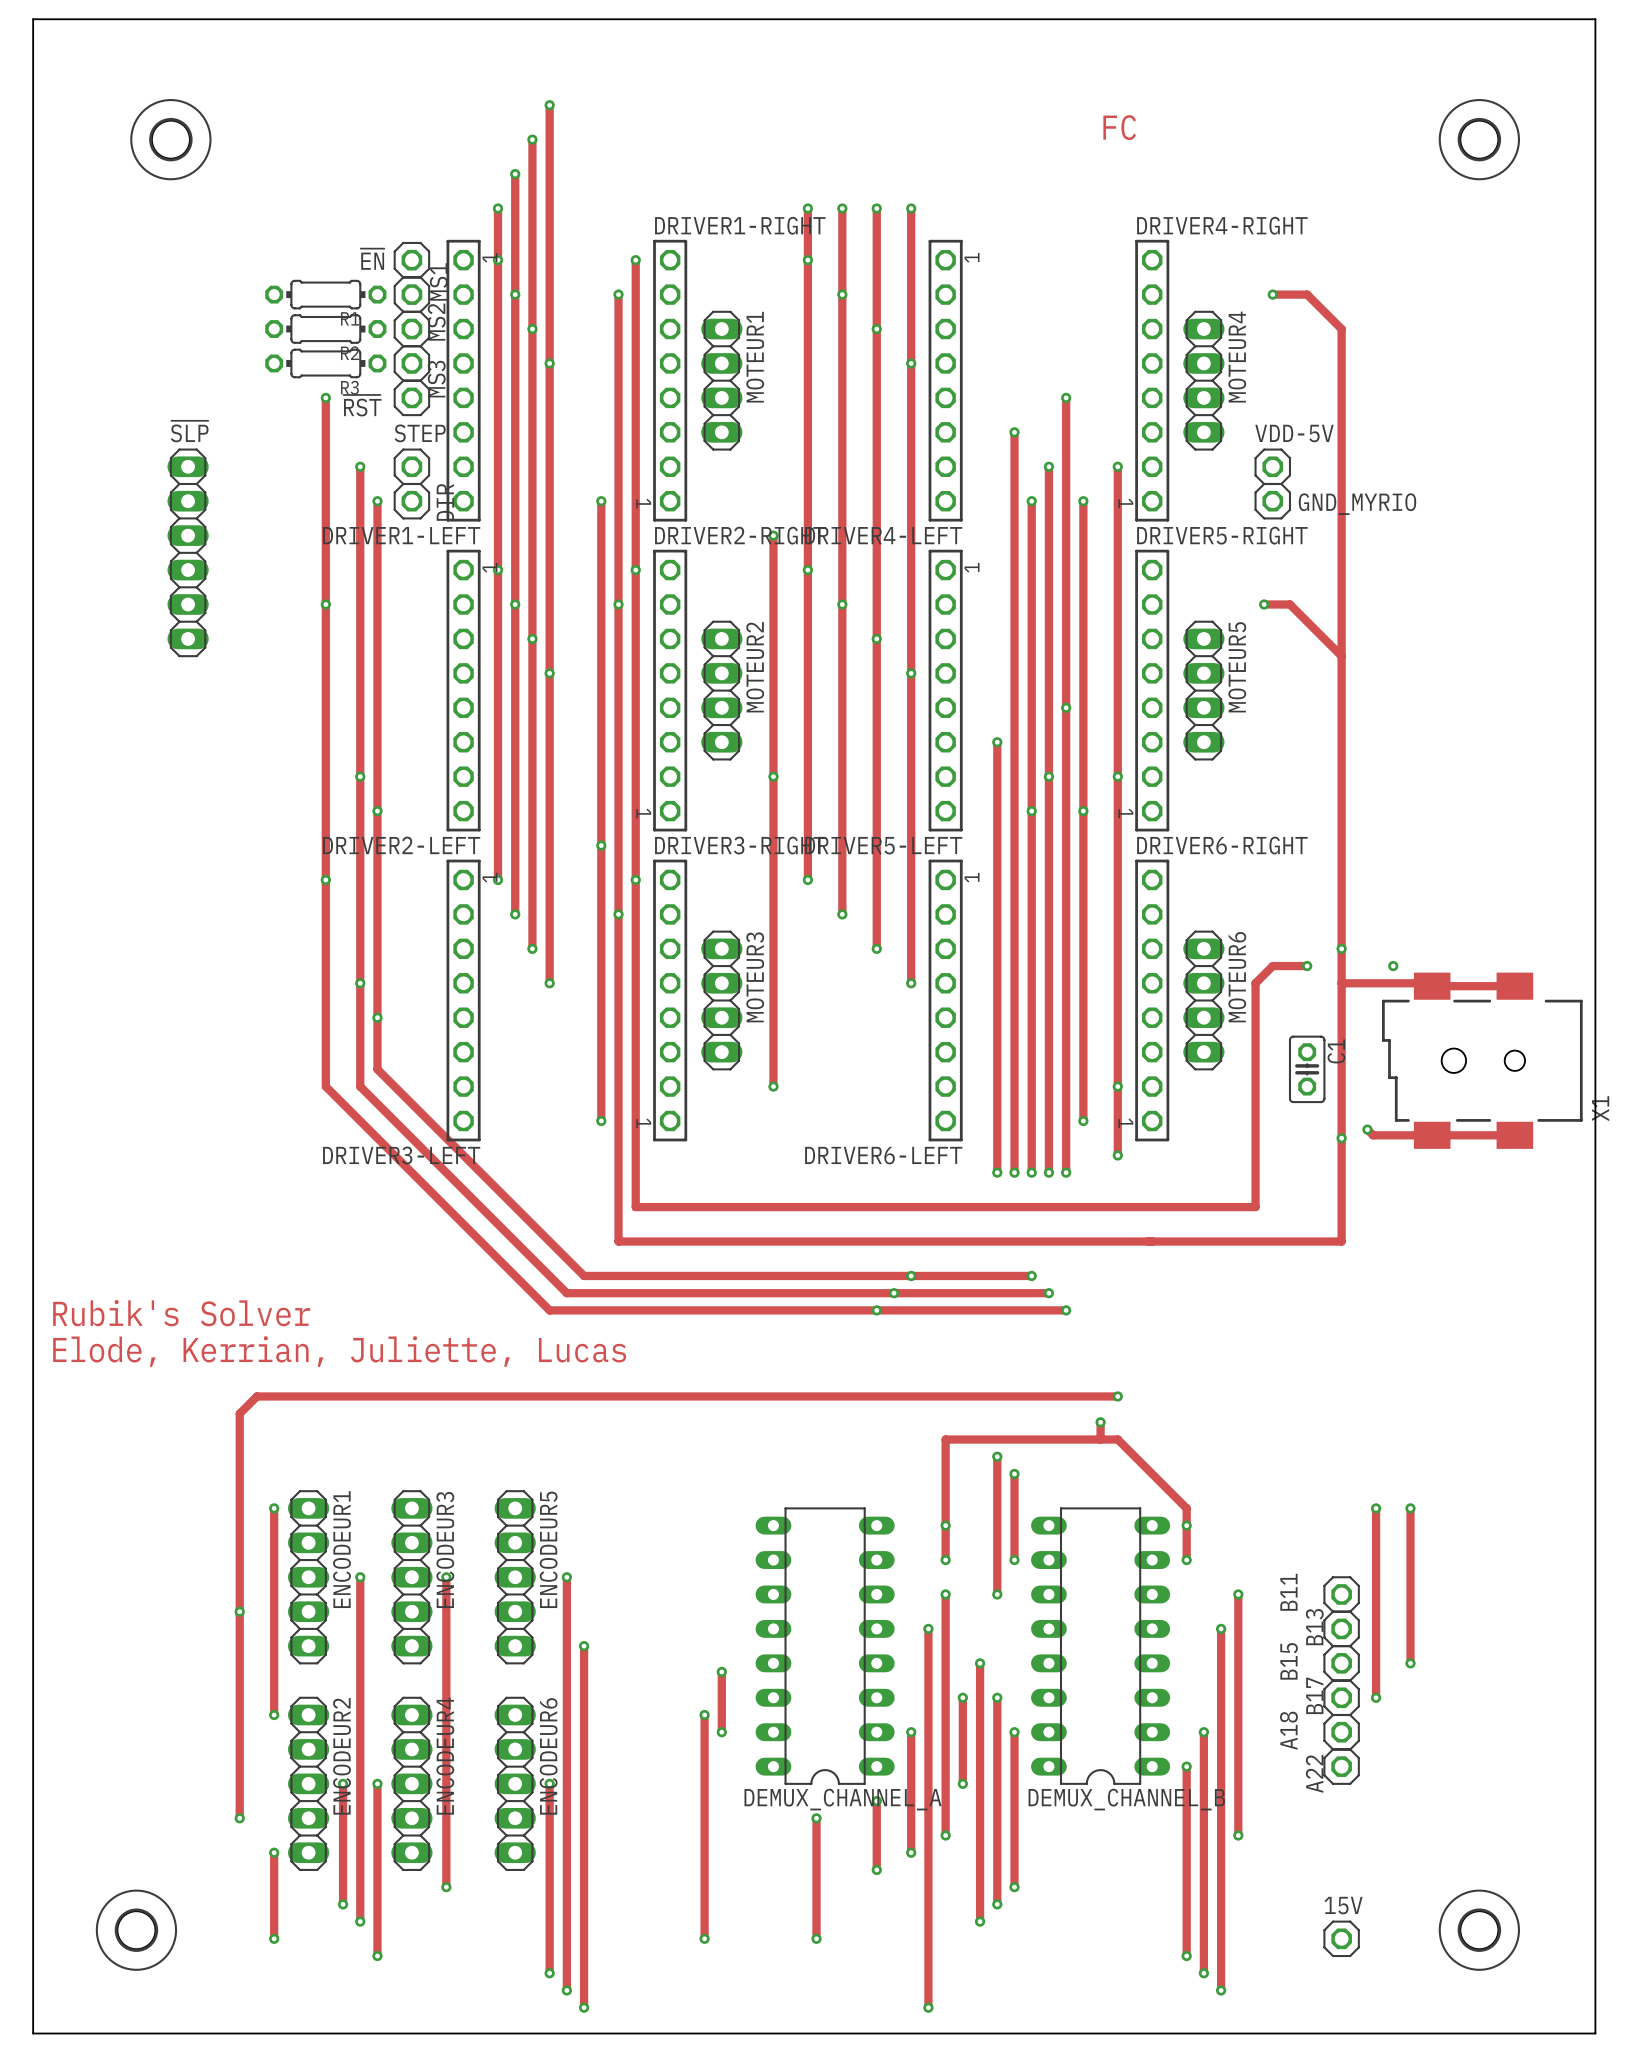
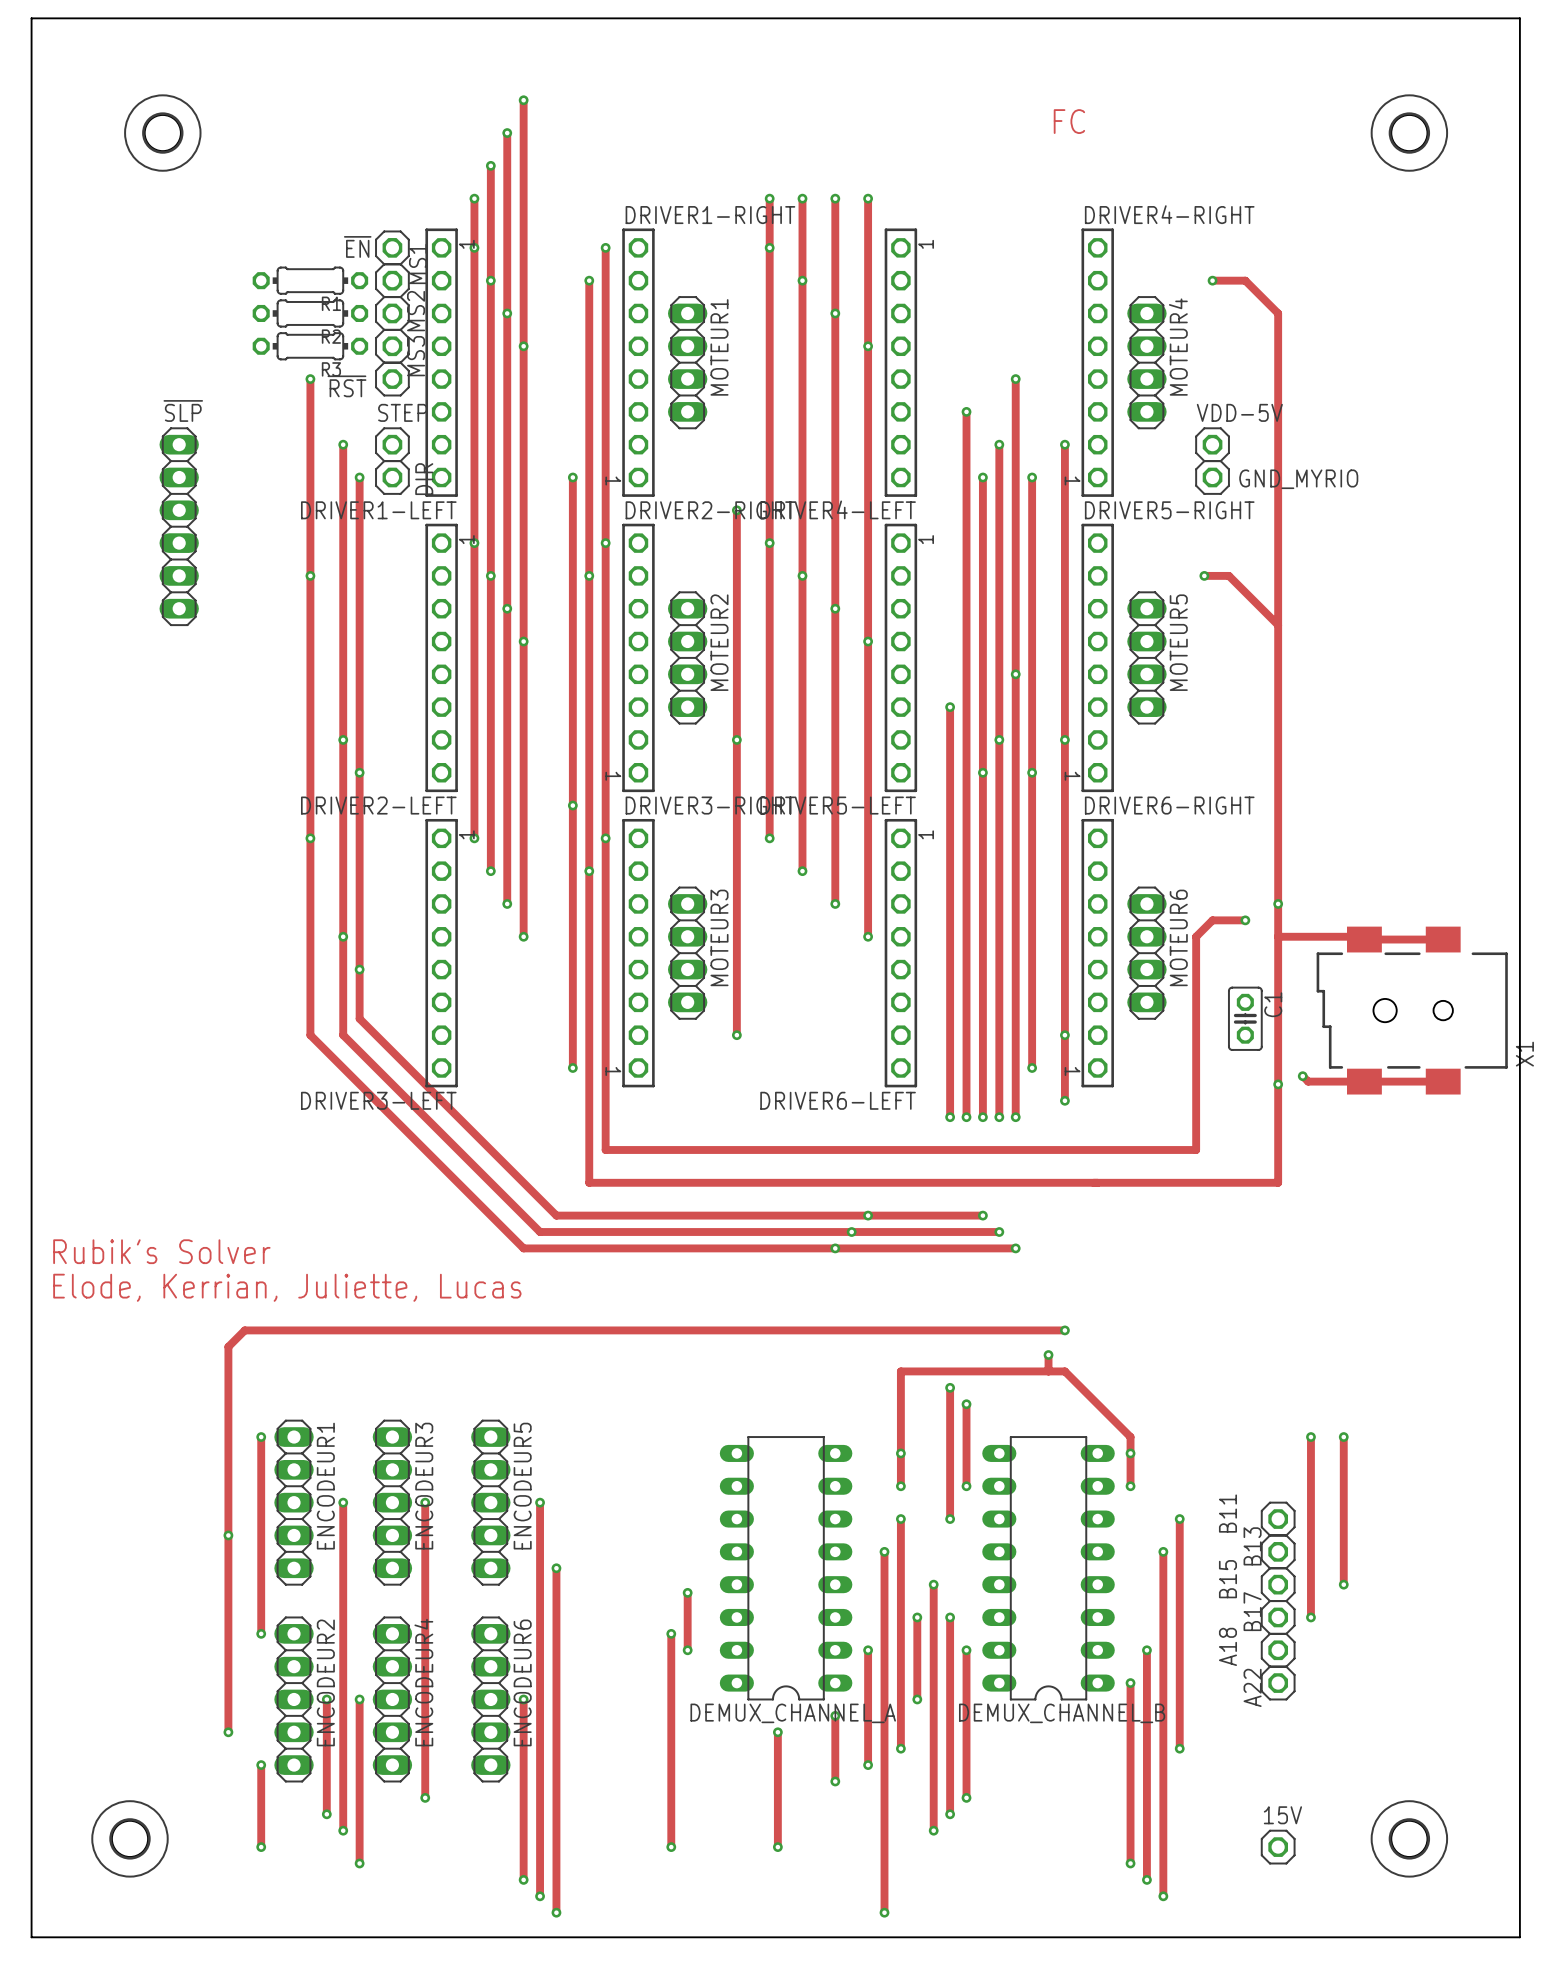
via: (1393, 966) -> none

